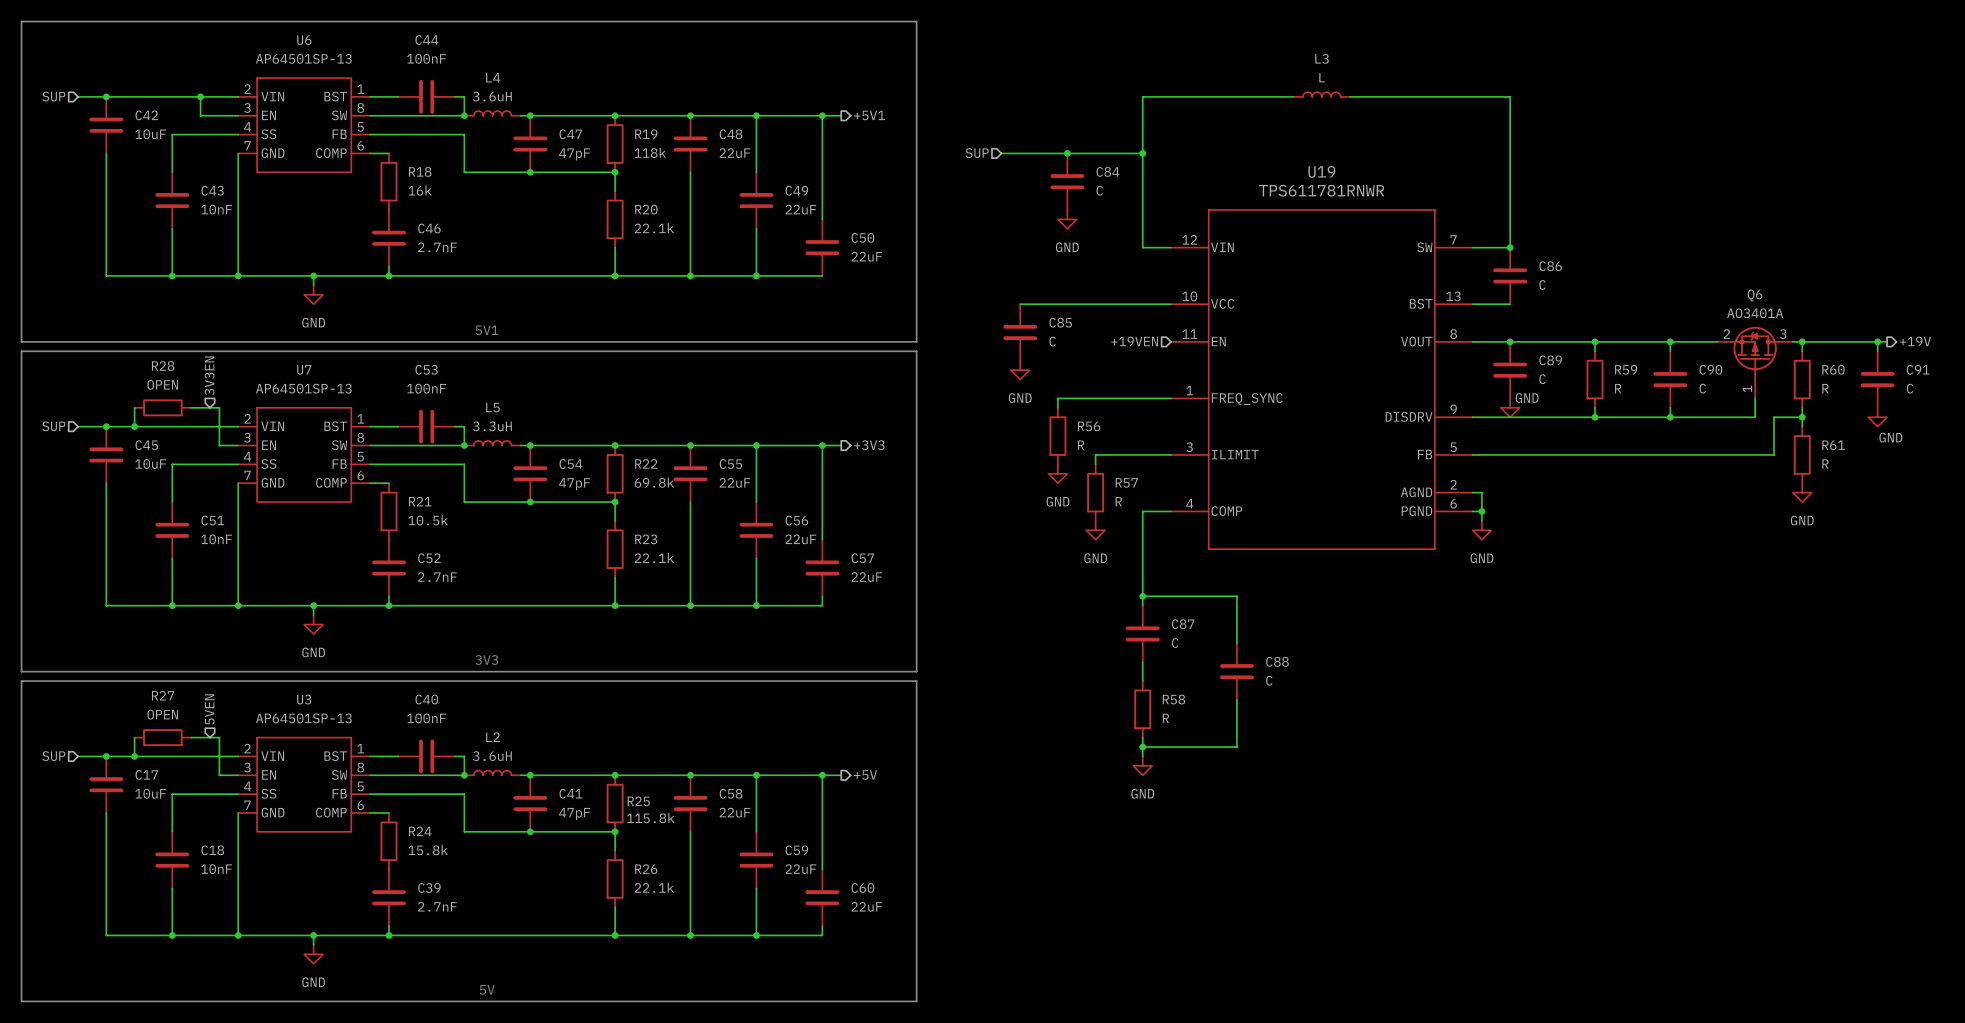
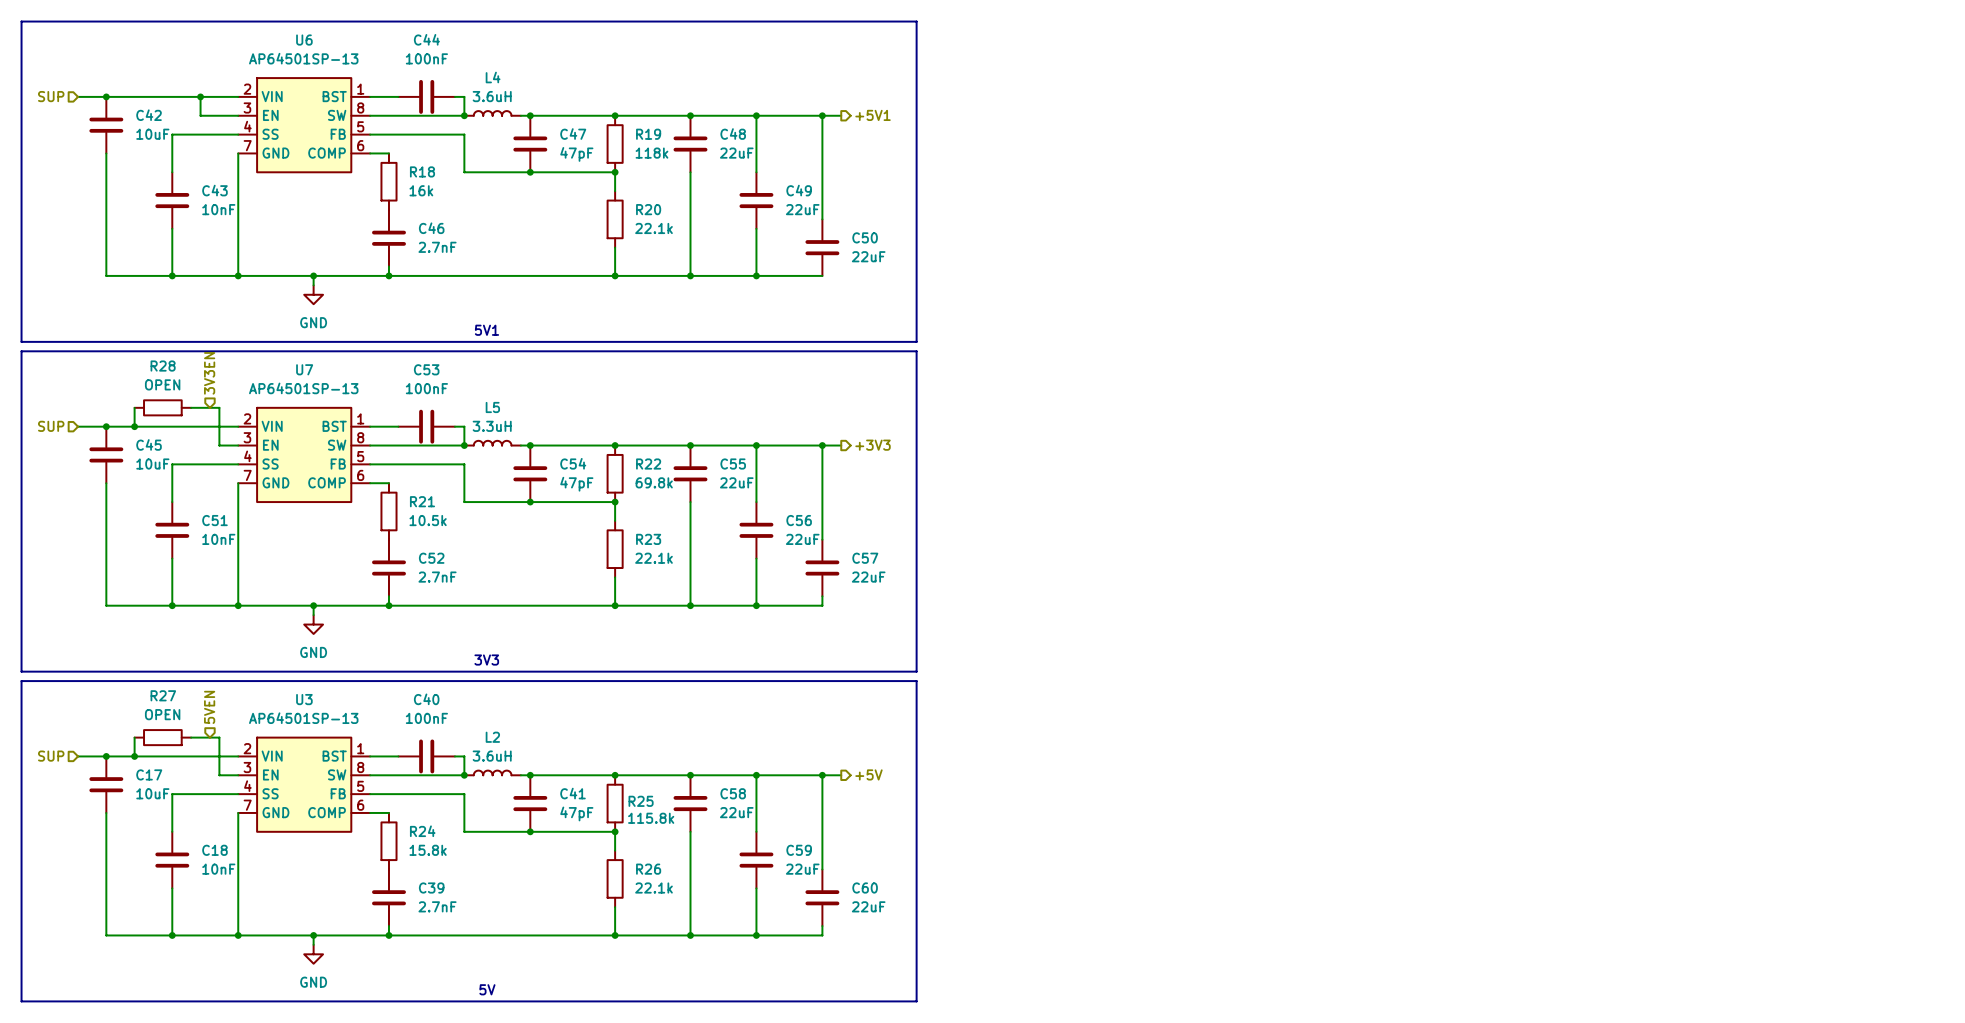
L3: L (1321, 94) -> none
wire: (1293, 96) (1142, 96) (1142, 247) (1171, 247) -> none
wire: (1350, 96) (1510, 96) (1510, 247) (1472, 247) -> none
hierarchical label: SUP (977, 153) -> none
wire: (1001, 153) (1142, 153) -> none
junction: (1067, 153) -> none
junction: (1142, 153) -> none
C84: C (1067, 181) -> none
power symbol: GND (1067, 219) -> none
junction: (1510, 247) -> none
C86: C (1510, 275) -> none
wire: (1020, 304) (1171, 304) -> none
wire: (1472, 304) (1510, 304) -> none
C85: C (1020, 332) -> none
hierarchical label: +19VEN (1134, 341) -> none
wire: (1472, 341) (1717, 341) -> none
junction: (1510, 341) -> none
wire: (1594, 341) (1594, 351) -> none
junction: (1594, 341) -> none
wire: (1670, 341) (1670, 351) -> none
junction: (1670, 341) -> none
wire: (1792, 341) (1887, 341) -> none
wire: (1802, 341) (1802, 351) -> none
junction: (1802, 341) -> none
wire: (1877, 341) (1877, 351) -> none
junction: (1877, 341) -> none
hierarchical label: +19V (1915, 341) -> none
Q6: AO3401A (1755, 362) -> none
power symbol: GND (1020, 370) -> none
C89: C (1510, 370) -> none
U19: TPS611781RNWR (1321, 379) -> none
R59: R (1594, 379) -> none
C90: C (1670, 379) -> none
R60: R (1802, 379) -> none
C91: C (1877, 379) -> none
wire: (1171, 398) (1057, 398) (1057, 407) -> none
wire: (1755, 398) (1755, 417) (1472, 417) -> none
power symbol: GND (1510, 407) -> none
wire: (1594, 407) (1594, 417) -> none
wire: (1670, 407) (1670, 417) -> none
wire: (1802, 407) (1802, 426) -> none
junction: (1594, 417) -> none
junction: (1670, 417) -> none
wire: (1802, 417) (1774, 417) (1774, 454) (1472, 454) -> none
junction: (1802, 417) -> none
power symbol: GND (1877, 417) -> none
R56: R (1057, 436) -> none
wire: (1171, 454) (1095, 454) (1095, 464) -> none
R61: R (1802, 454) -> none
power symbol: GND (1057, 473) -> none
R57: R (1095, 492) -> none
wire: (1472, 492) (1481, 492) (1481, 520) -> none
power symbol: GND (1802, 492) -> none
wire: (1171, 511) (1142, 511) (1142, 605) -> none
wire: (1472, 511) (1481, 511) -> none
junction: (1481, 511) -> none
power symbol: GND (1095, 530) -> none
power symbol: GND (1481, 530) -> none
wire: (1142, 596) (1236, 596) (1236, 643) -> none
junction: (1142, 596) -> none
C87: C (1142, 633) -> none
wire: (1142, 662) (1142, 681) -> none
C88: C (1236, 671) -> none
wire: (1236, 699) (1236, 747) (1142, 747) -> none
R58: R (1142, 709) -> none
wire: (1142, 737) (1142, 756) -> none
junction: (1142, 747) -> none
power symbol: GND (1142, 765) -> none

